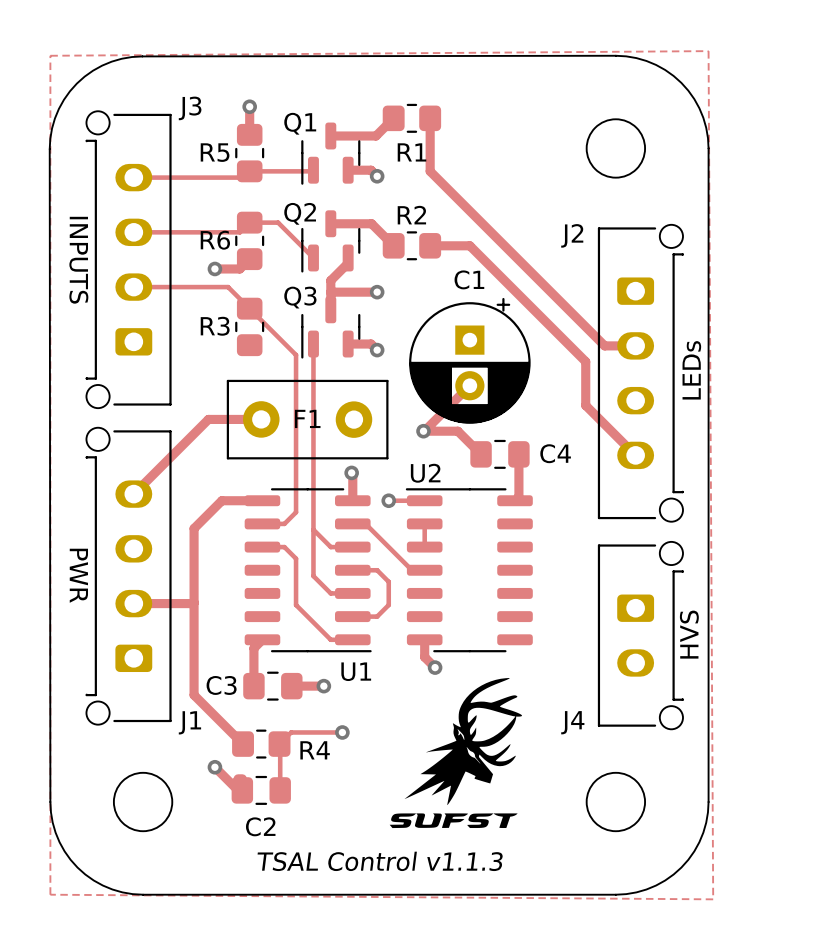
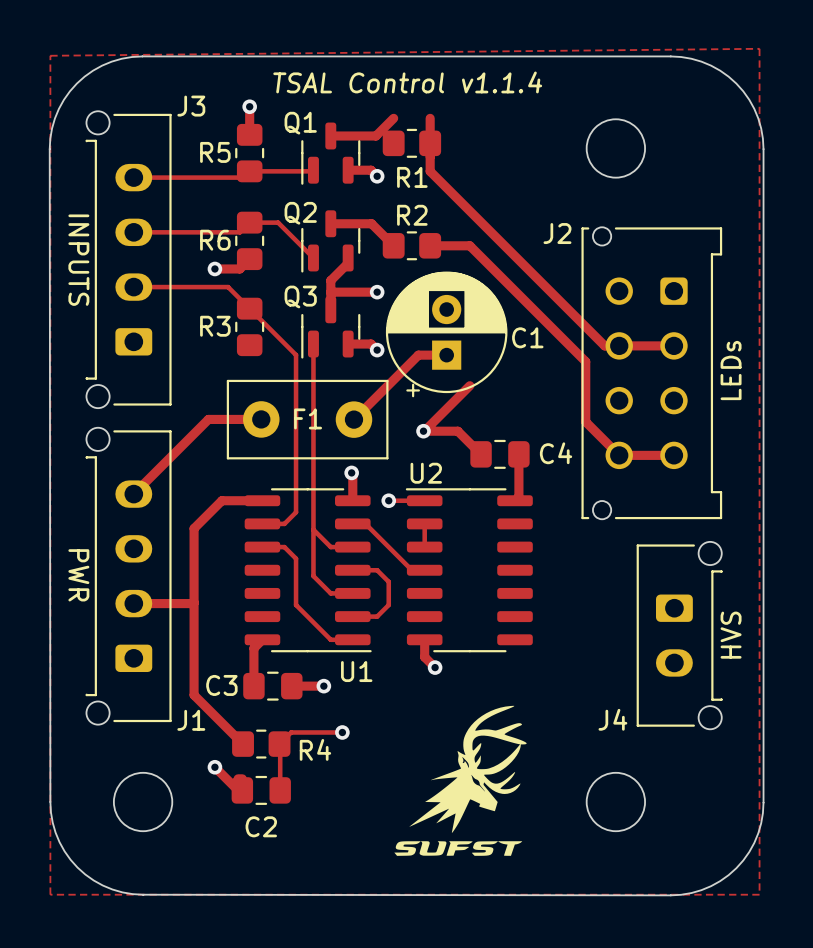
zone outline: (50, 55) (708, 51) (713, 899) (50, 894) -> (50, 55) (759, 48) (759, 894) (50, 894)
board edge: (142, 56) (626, 56) (656, 64) (681, 82) (699, 108) (706, 127) (708, 148) (708, 802) (703, 832) (688, 859) (673, 874) (656, 885) (626, 894) (143, 894) -> (142, 56) (681, 57) (711, 65) (728, 76) (743, 91) (758, 118) (763, 149) (763, 802) (758, 833) (743, 860) (728, 875) (711, 886) (681, 894) (143, 894)
text: none -> TSAL Control v1.1.4 (407, 82)
R1 position: (411, 118) -> (411, 143)
J2 footprint: [597, 224, 684, 522] -> [581, 227, 723, 520]
C1 name position: C1 (469, 279) -> C1 (527, 337)
track: none -> (635, 345) (673, 345)
track: none -> (446, 355) (418, 355) (353, 419)
C1 rotation: 0° (469, 360) -> 180° (446, 334)
text position: LEDs (691, 370) -> LEDs (731, 370)
track: (585, 405) (635, 455) -> (585, 405) (585, 421) (619, 455) (673, 455)
text position: HVS (689, 634) -> HVS (731, 635)
J4 position: (640, 635) -> (679, 635)
drawing position: (463, 741) -> (467, 769)
drawing position: (453, 820) -> (458, 848)
text: TSAL Control v1.1.3 (380, 861) -> none

